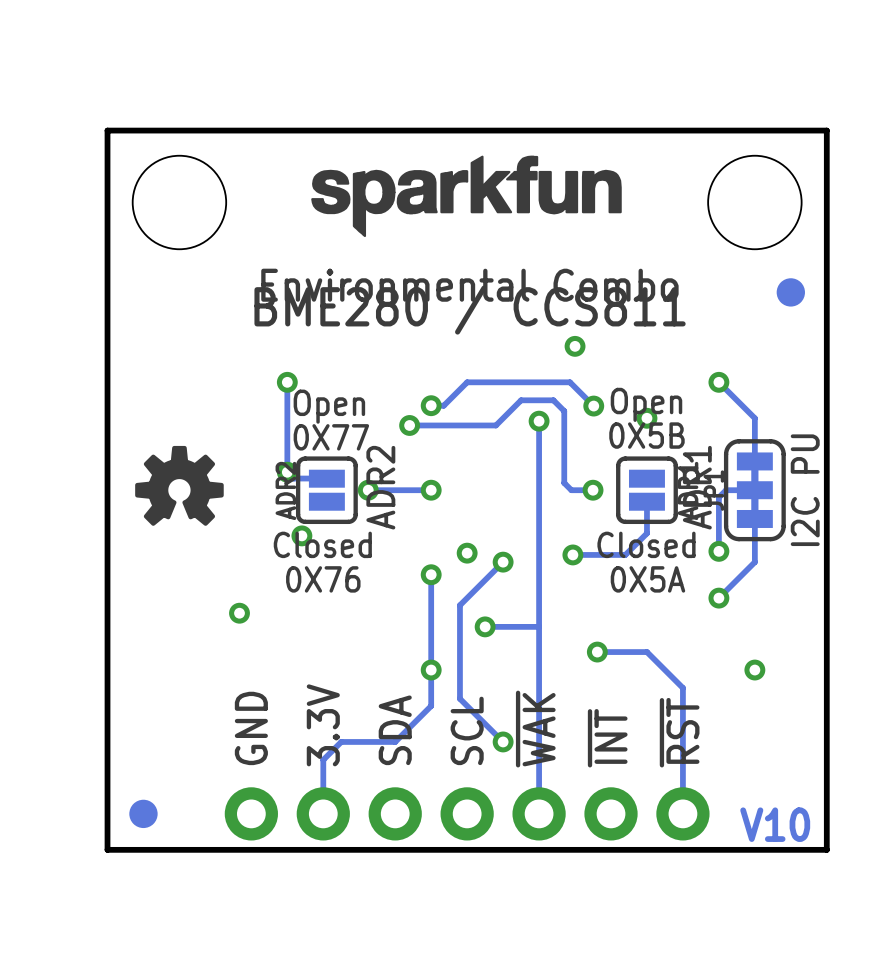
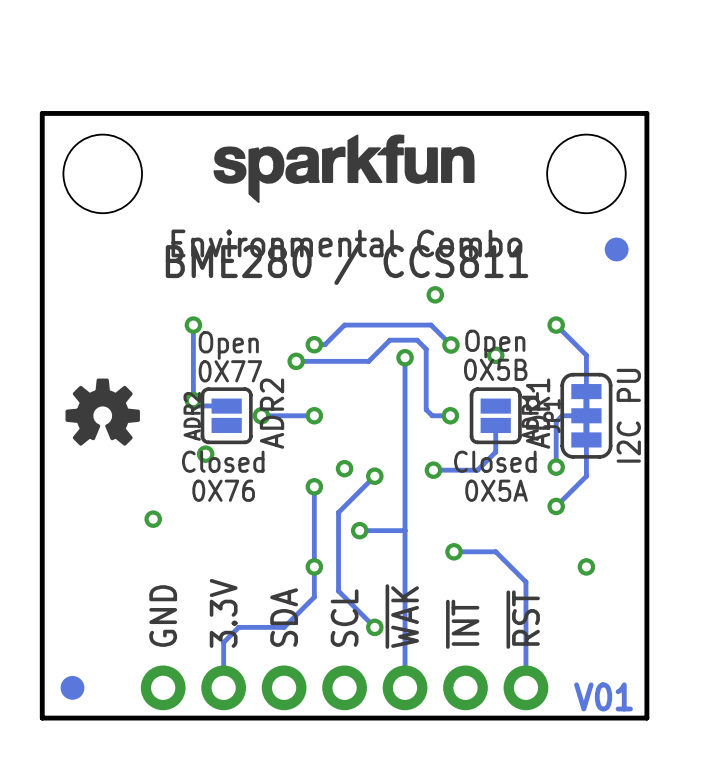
text: V10 (775, 824) -> V01 (603, 696)

